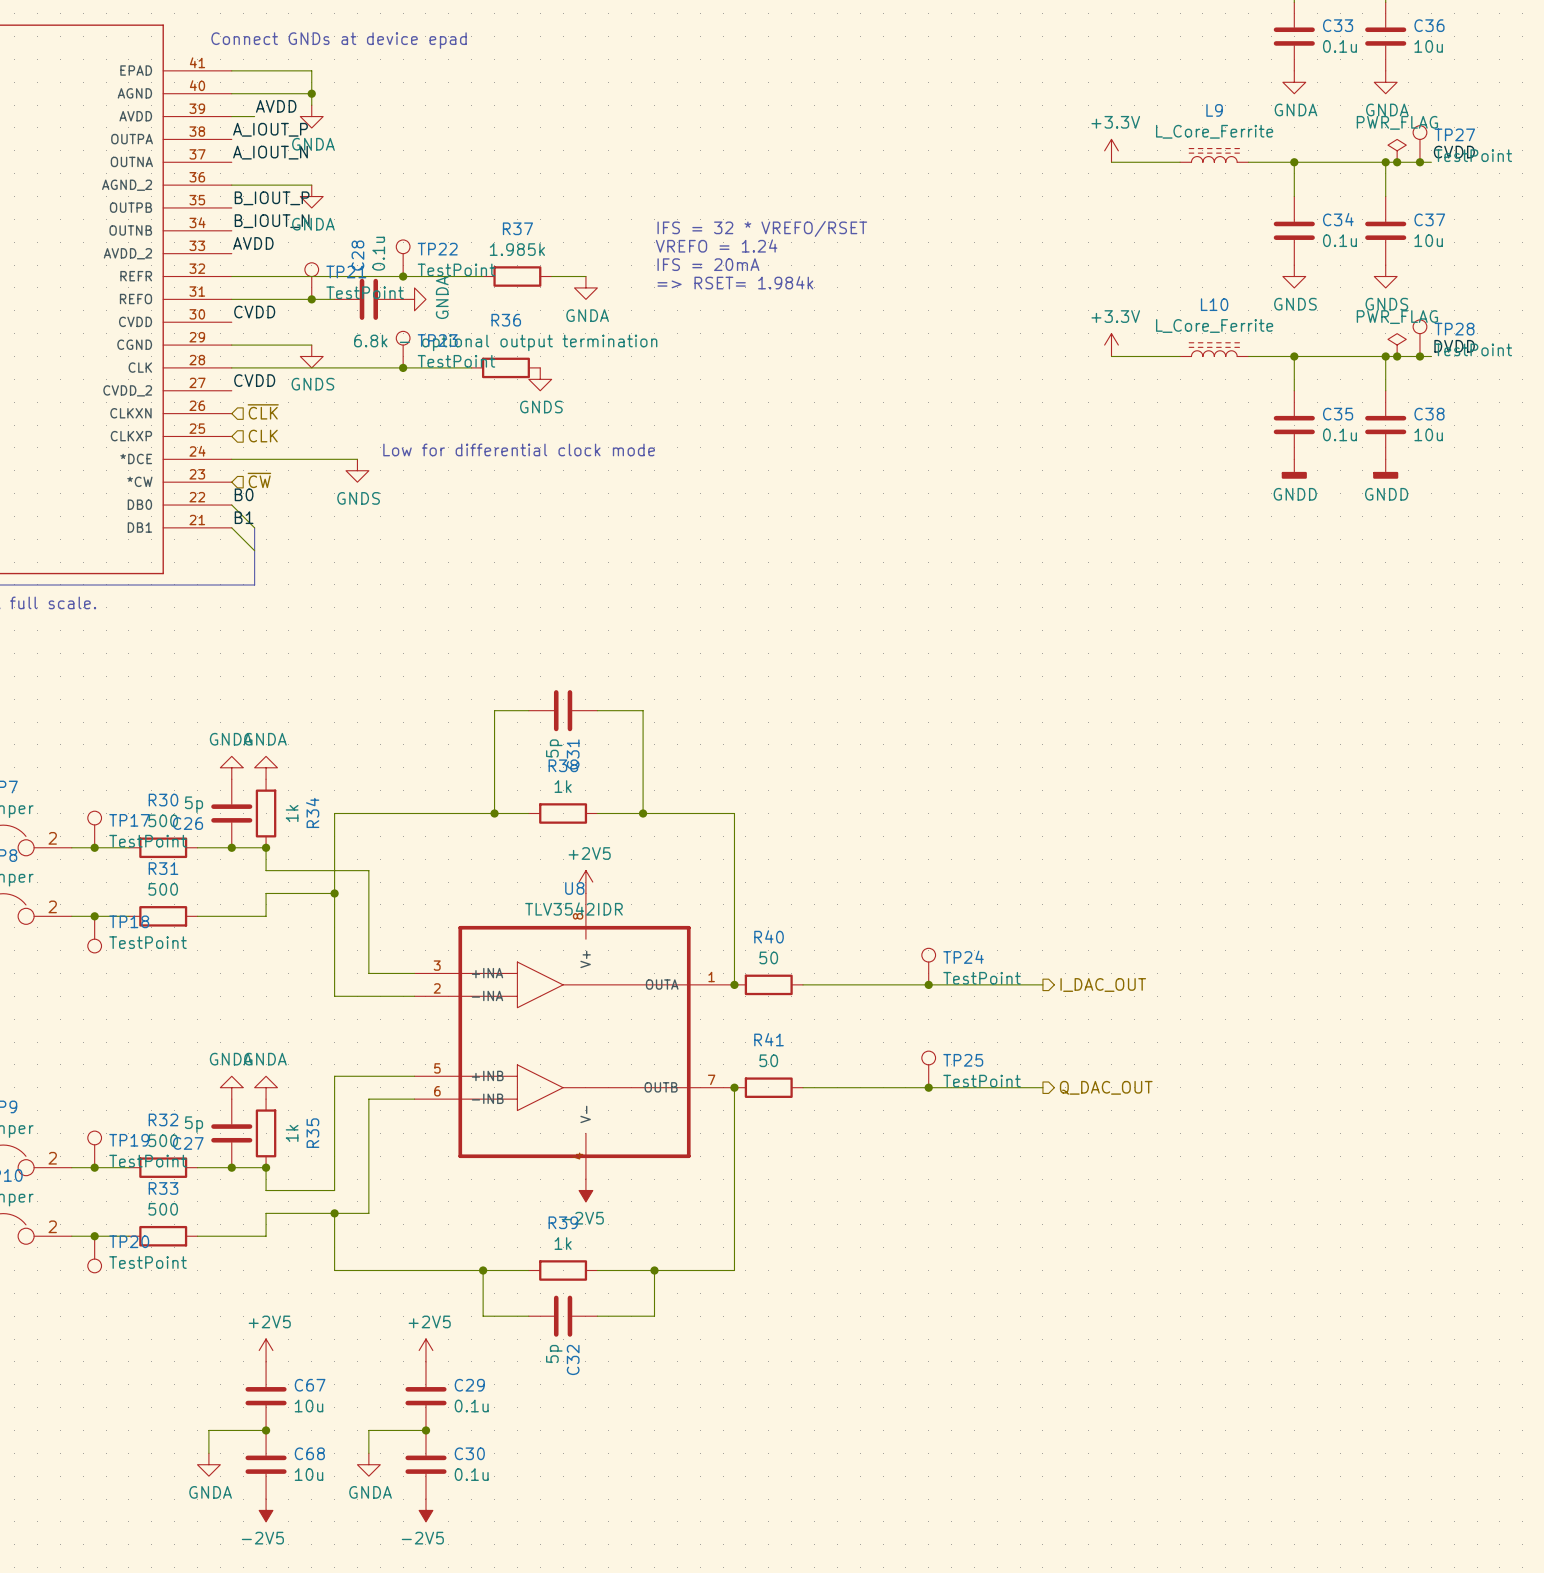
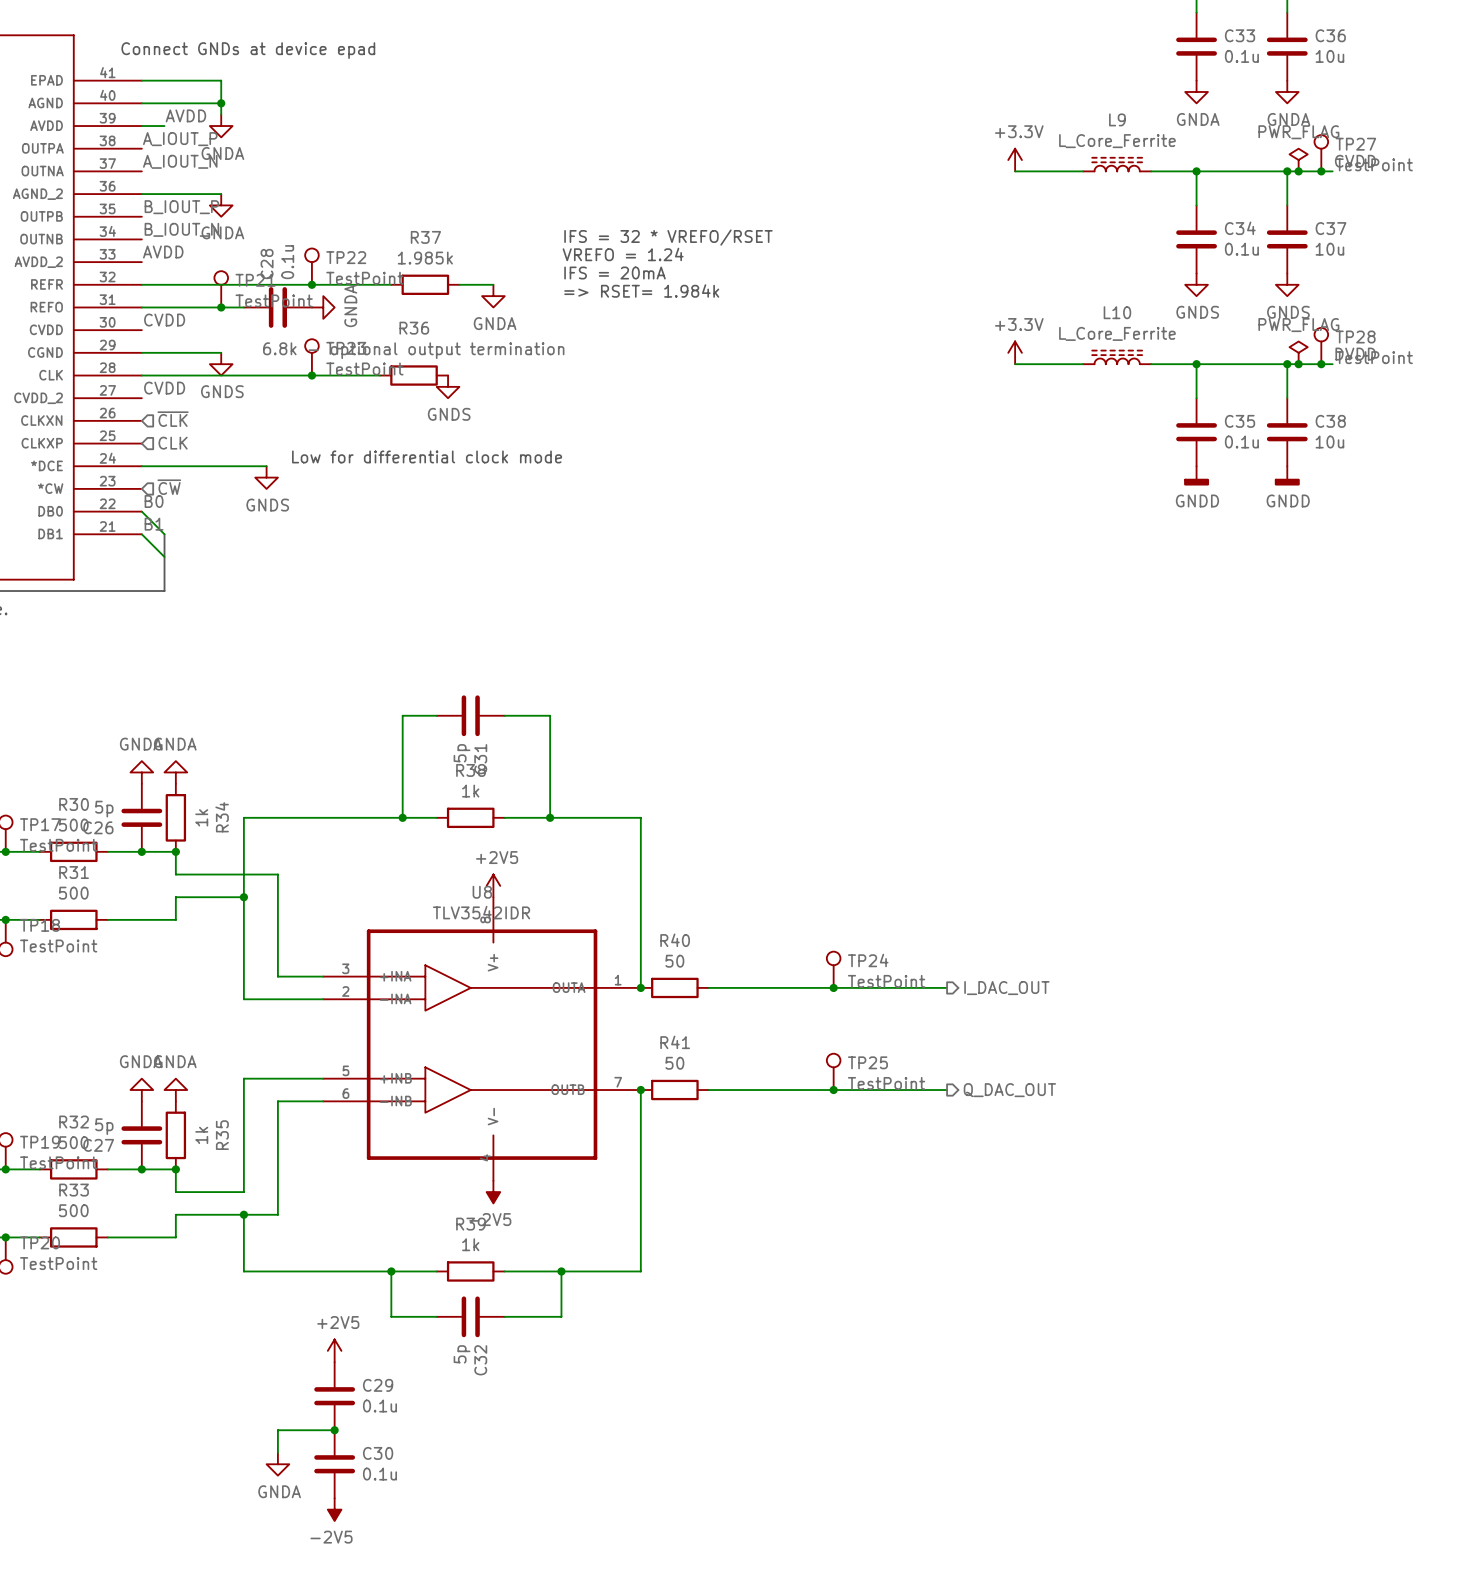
power symbol: +2V5 (266, 1350) -> none
C67: 10u (266, 1396) -> none
wire: (266, 1430) (208, 1430) (208, 1453) -> none
junction: (266, 1430) -> none
power symbol: GNDA (208, 1464) -> none
C68: 10u (266, 1464) -> none
power symbol: -2V5 (266, 1510) -> none

